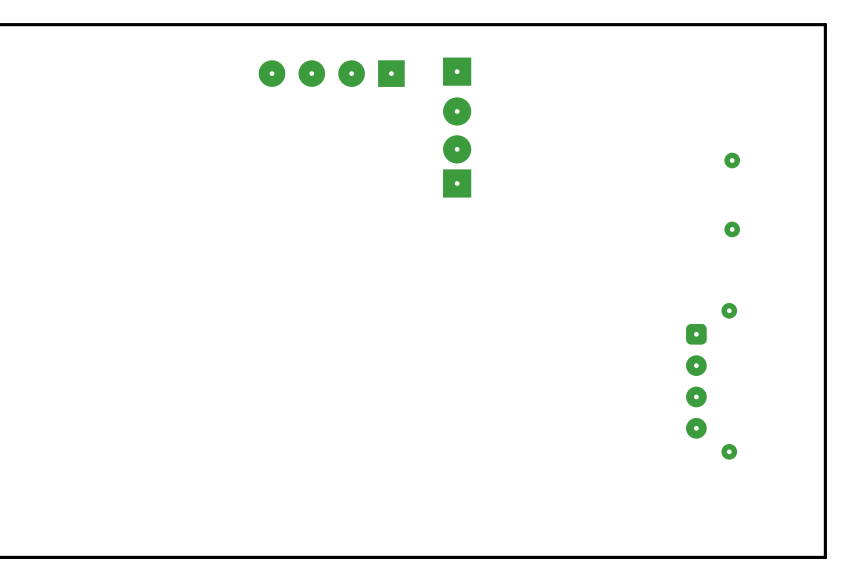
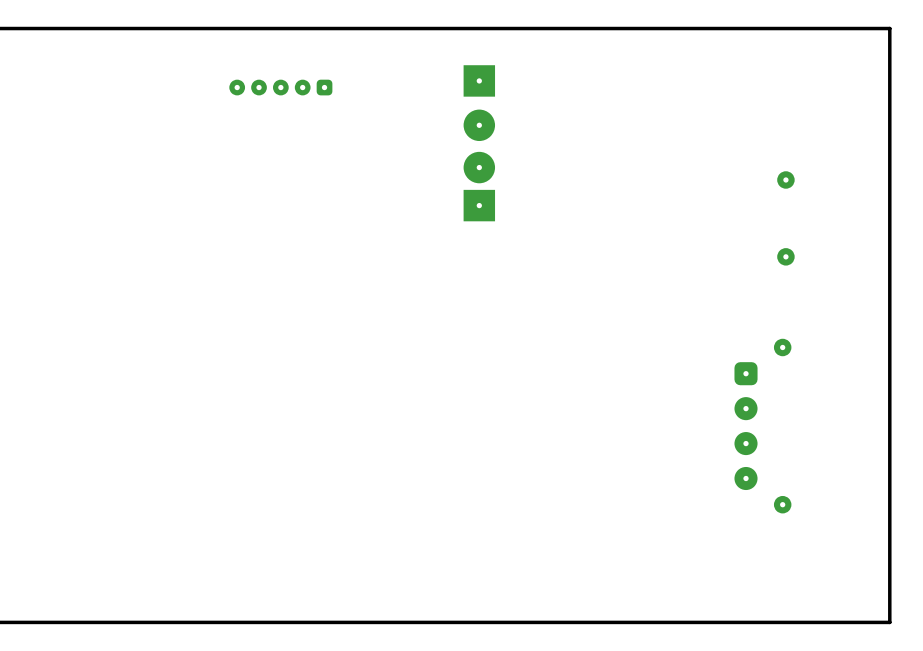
part: (331, 73) -> none
part: none -> (280, 87)

